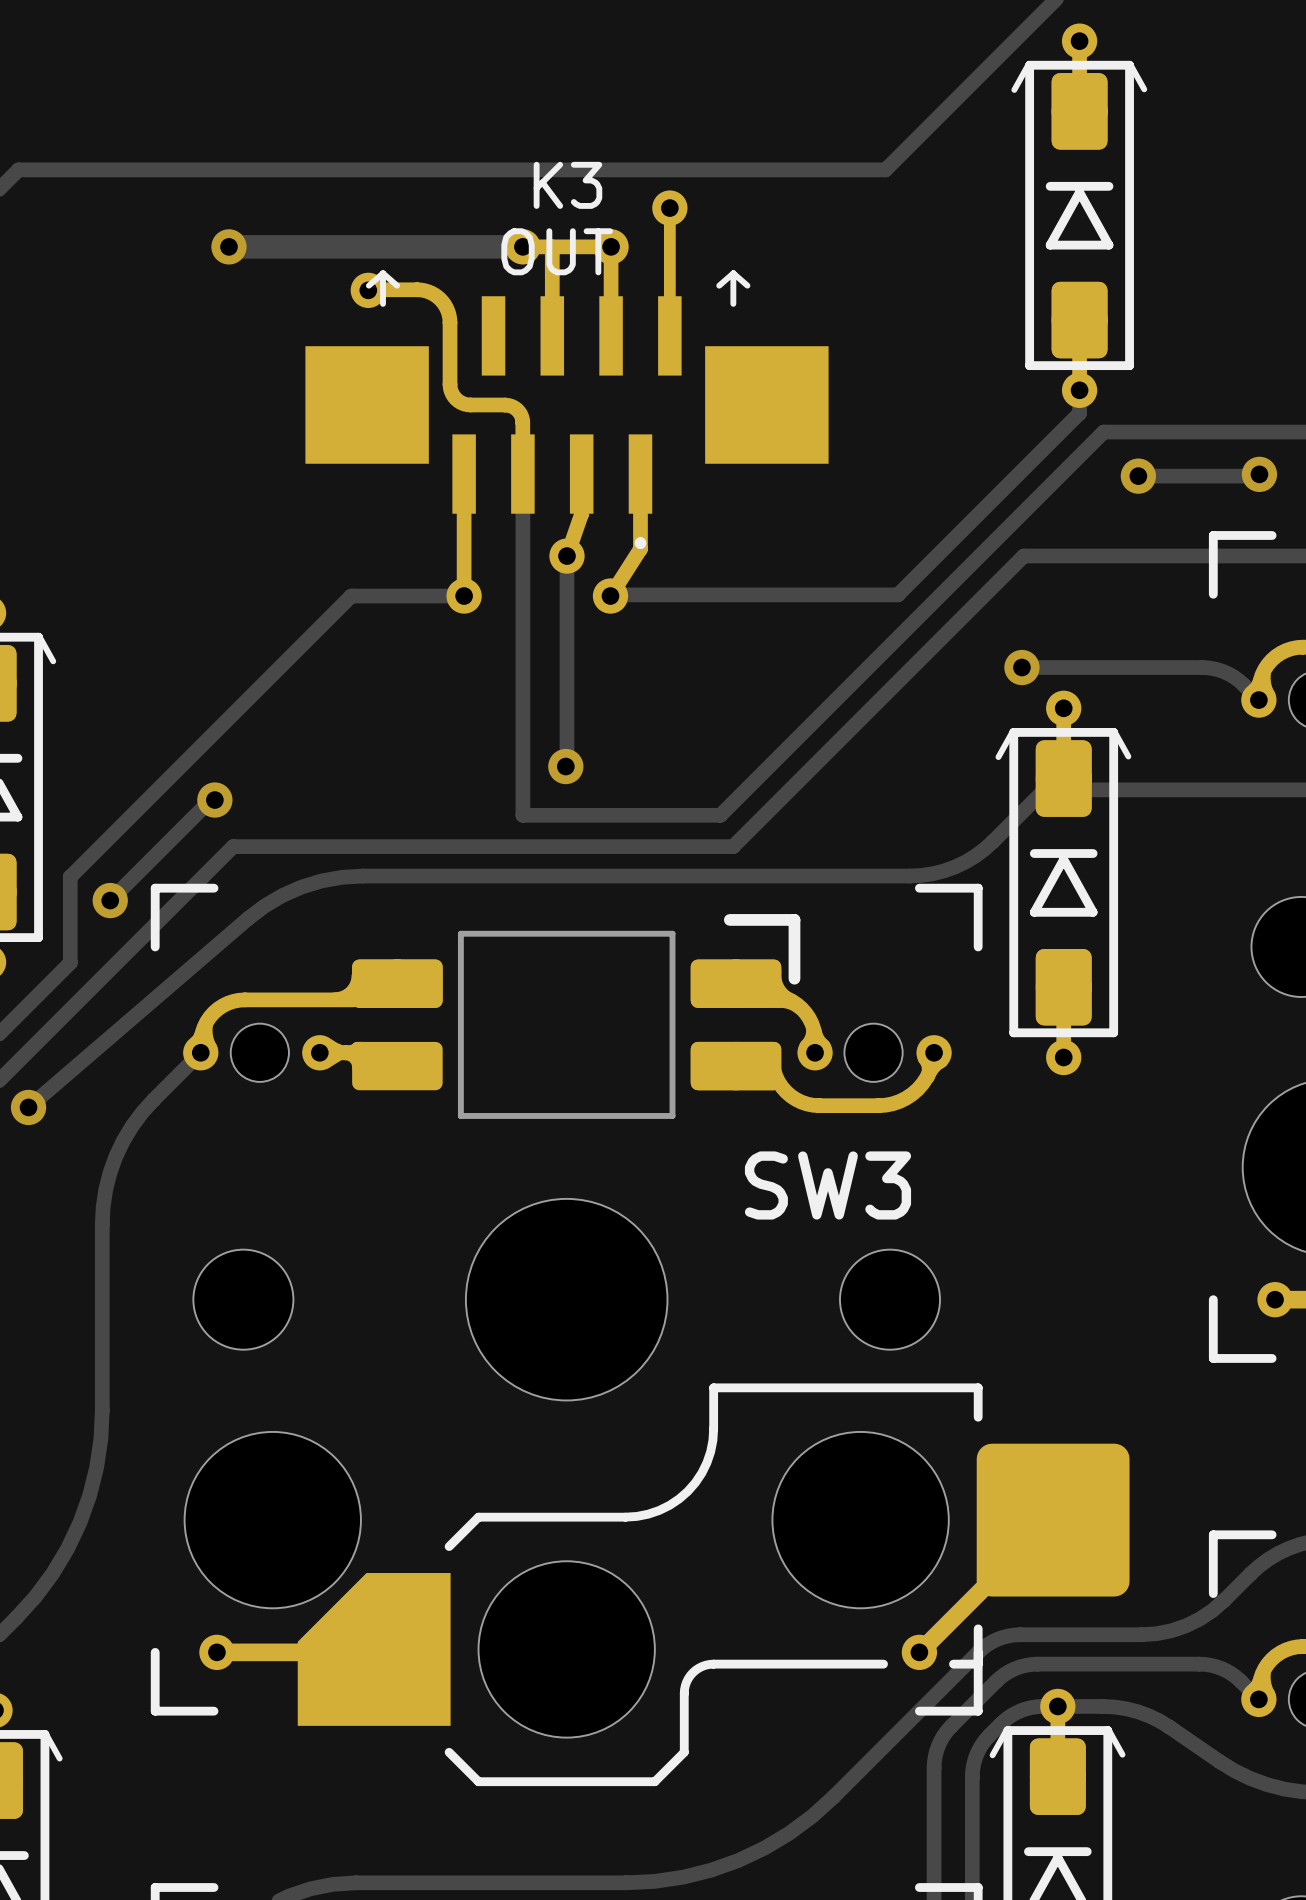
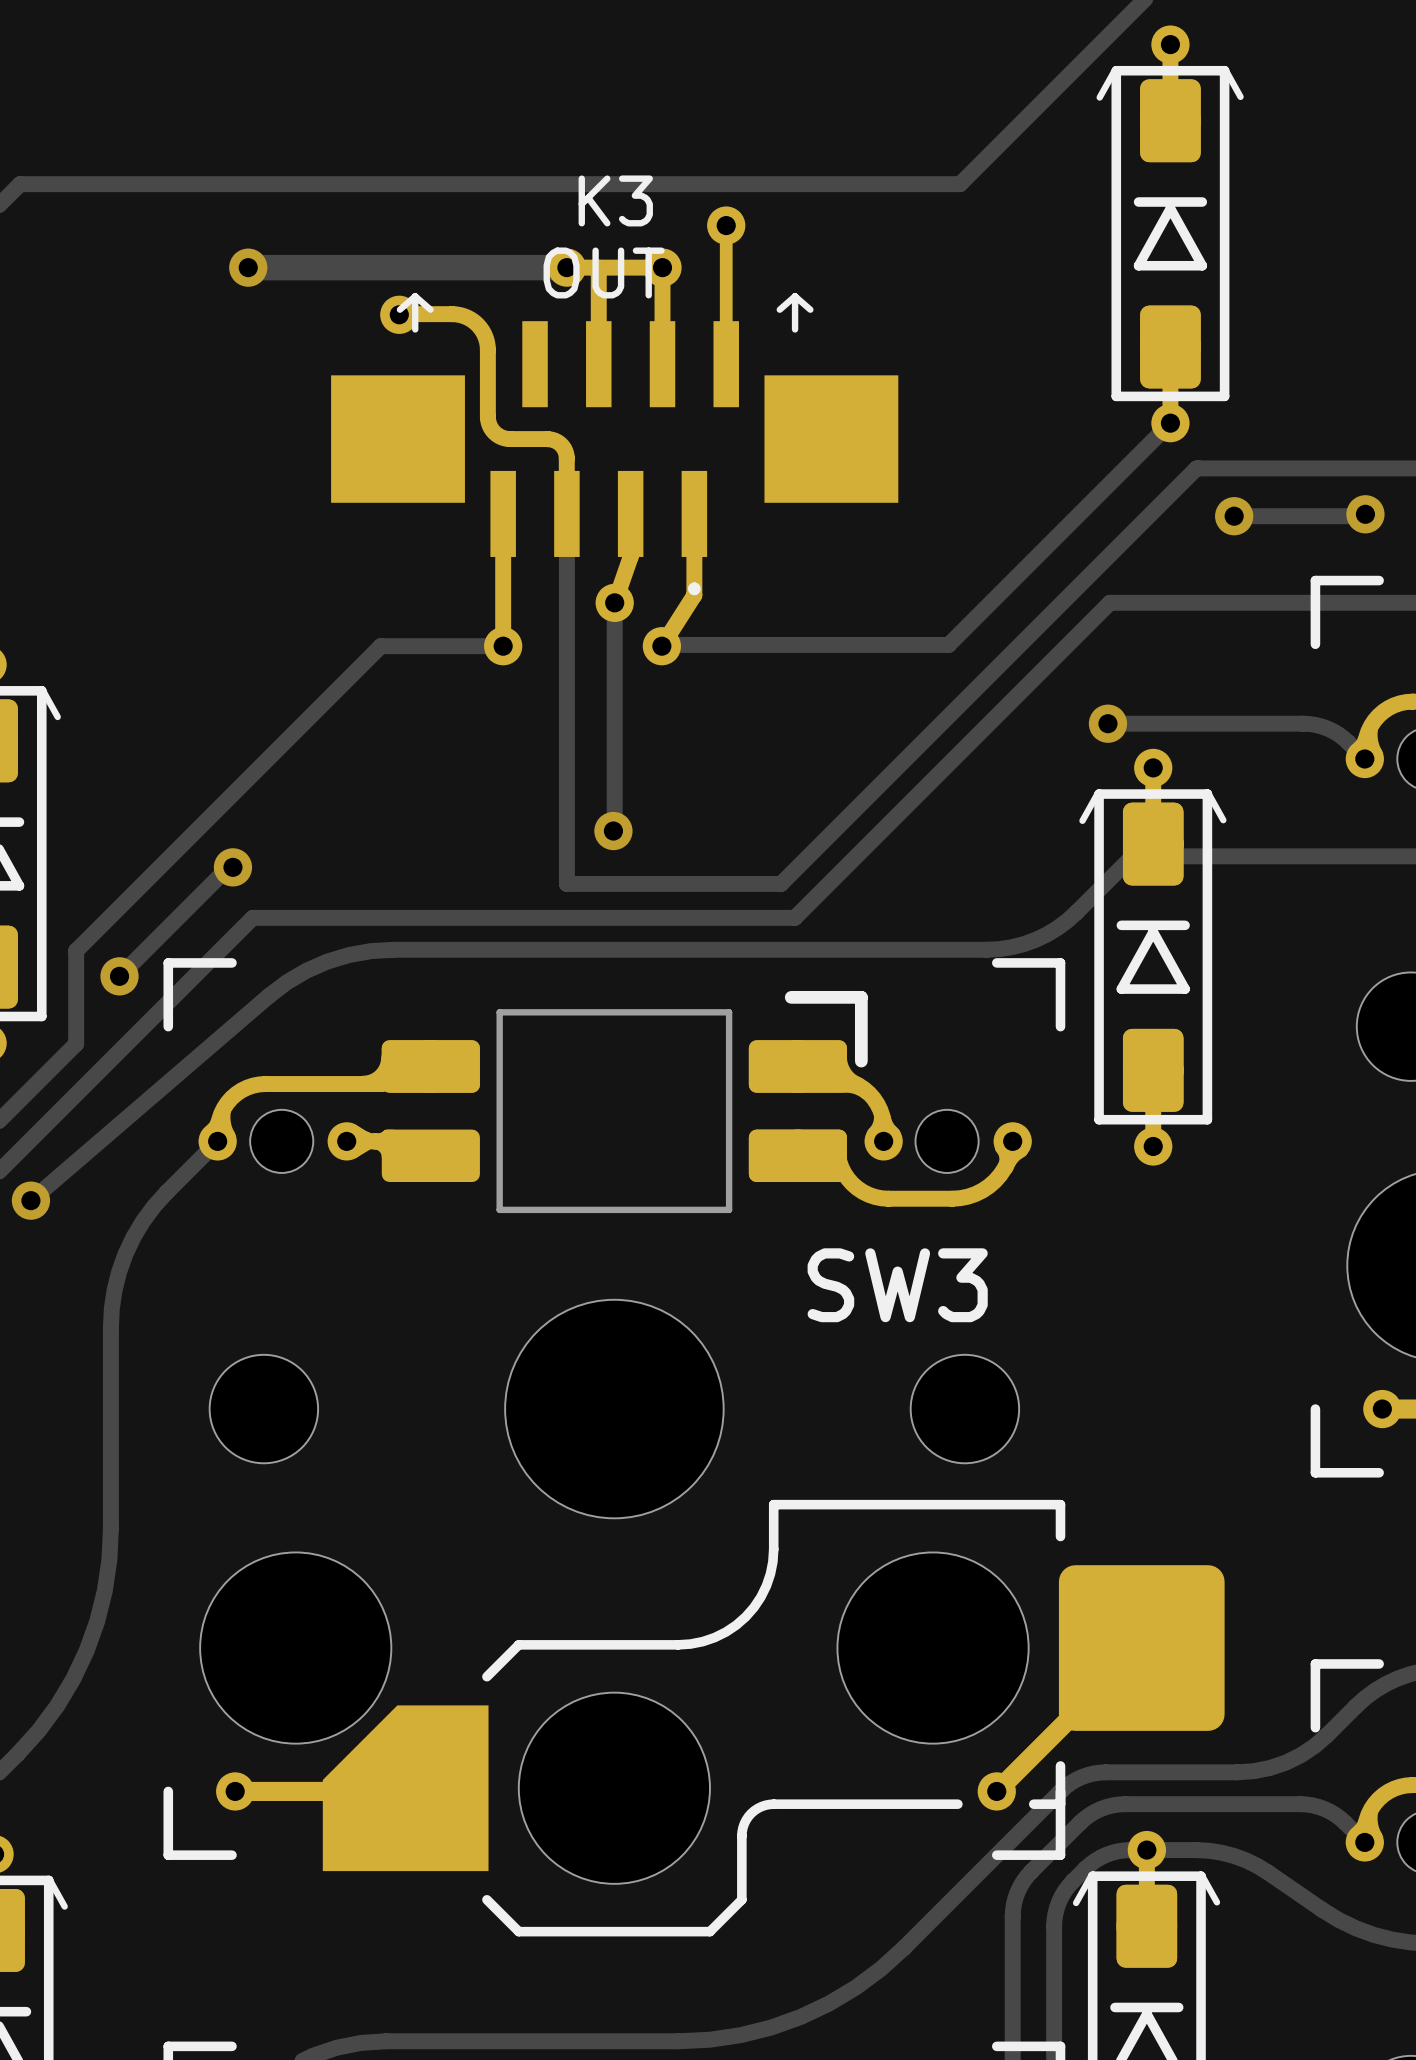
track: (1079, 390) (1079, 413) (897, 594) (875, 594) -> (1170, 423) (948, 644)

